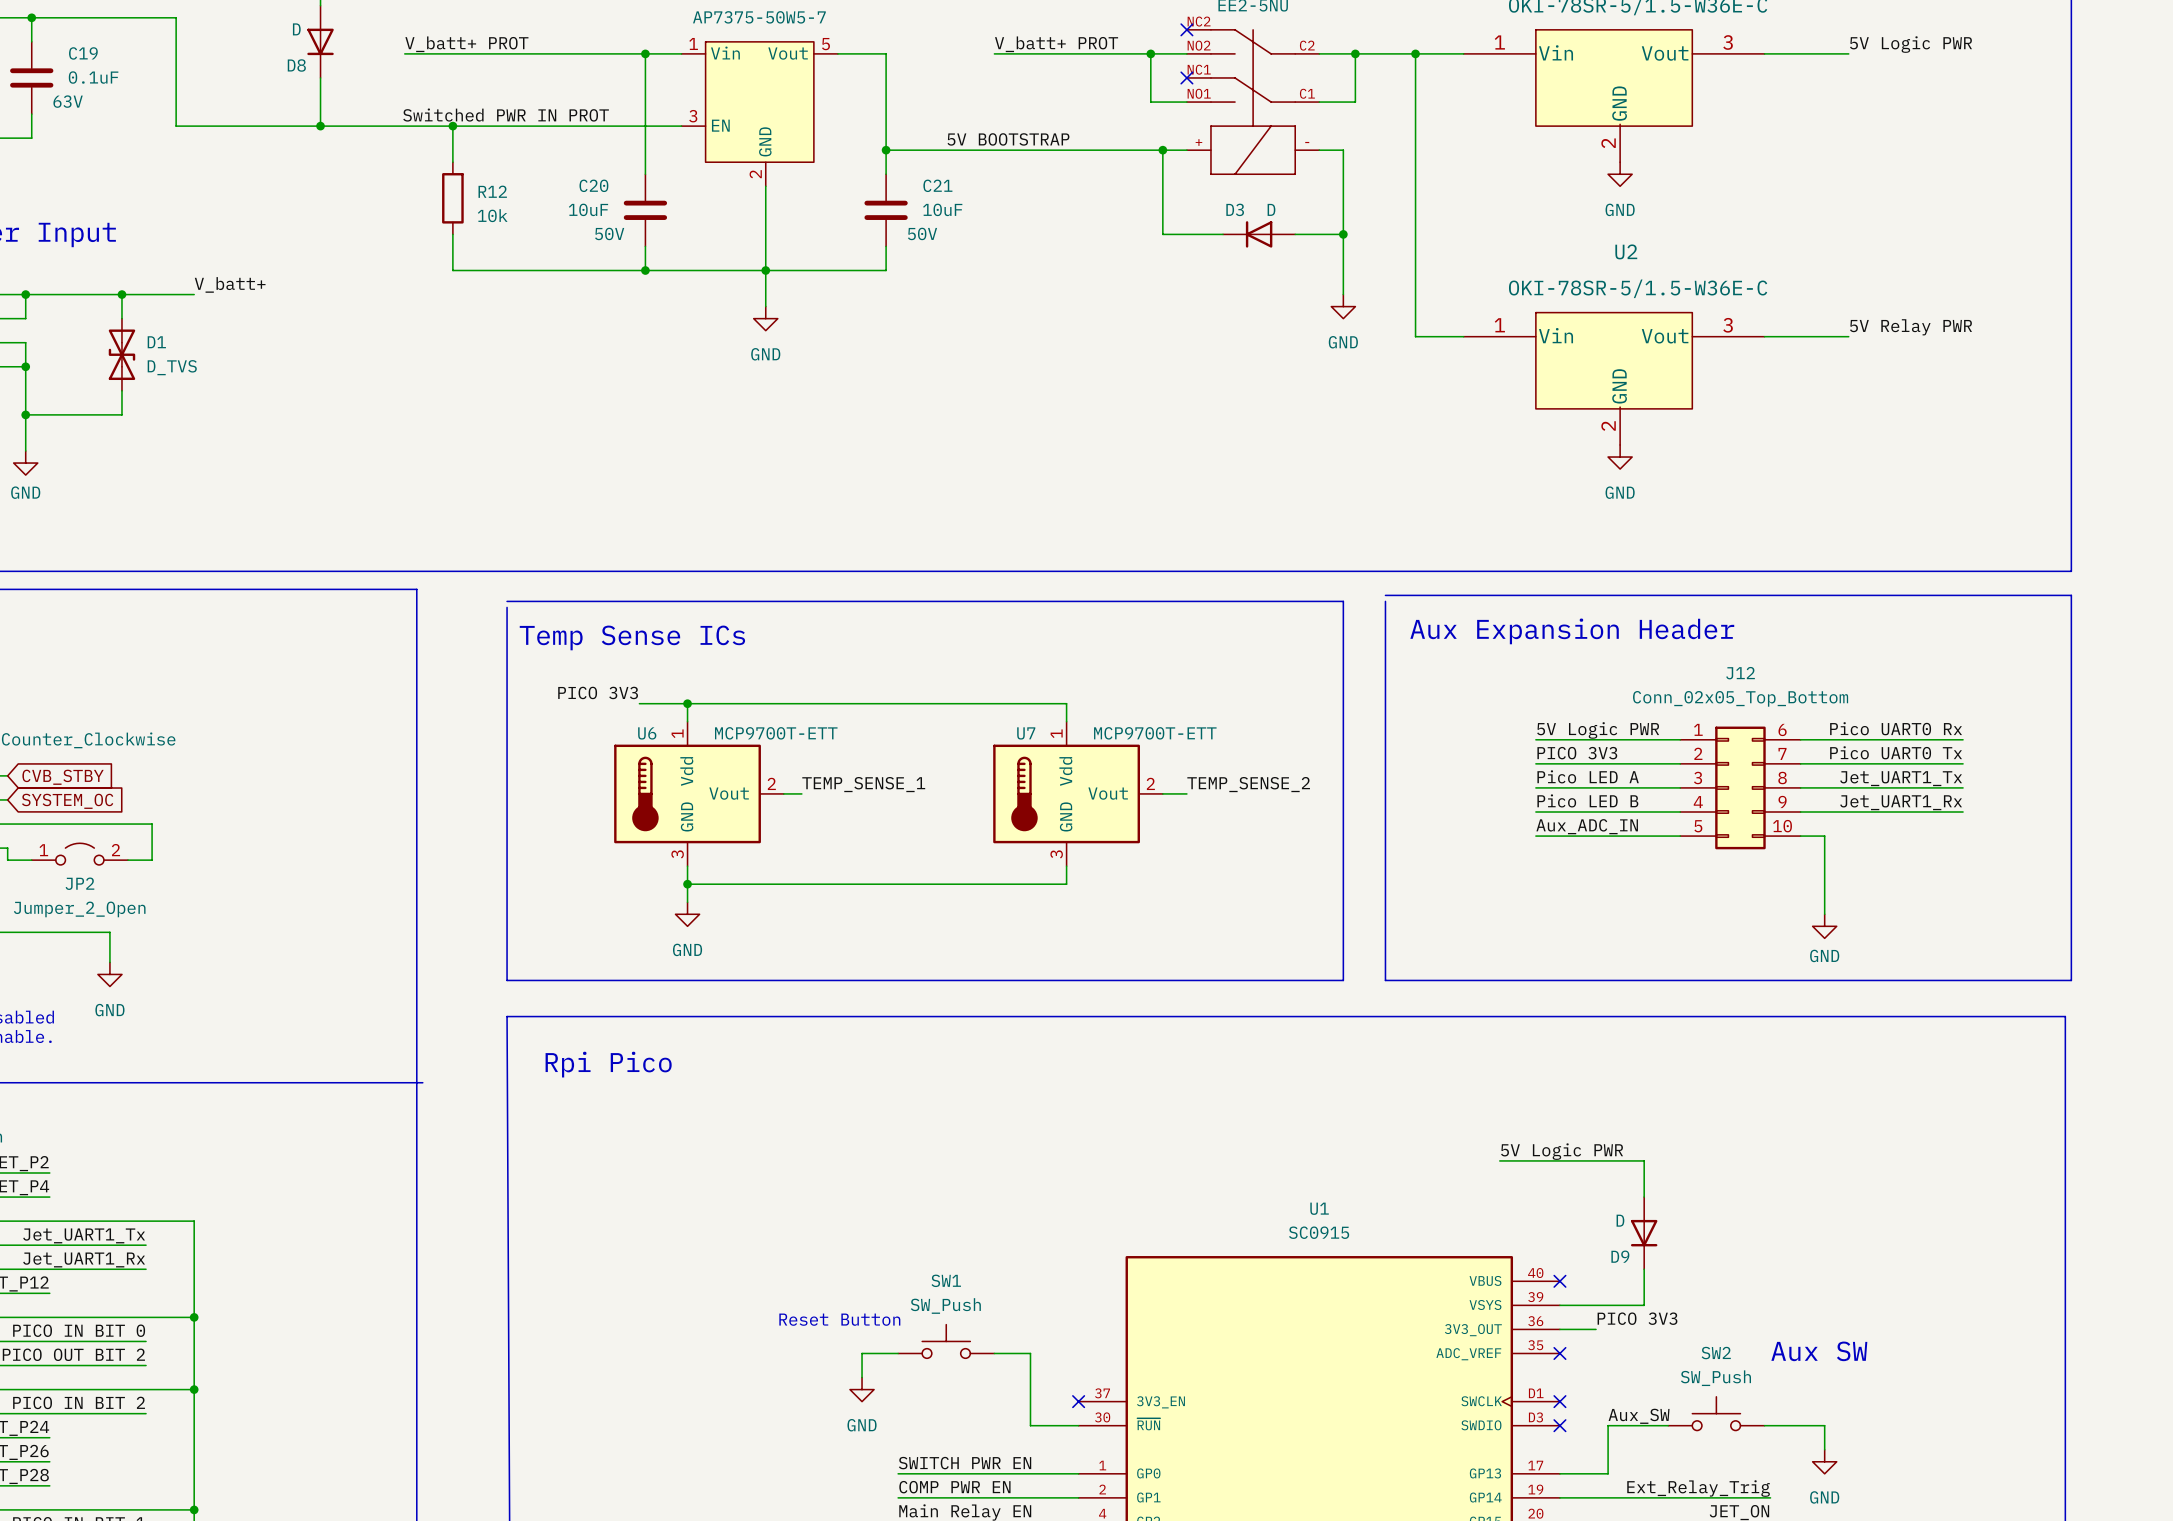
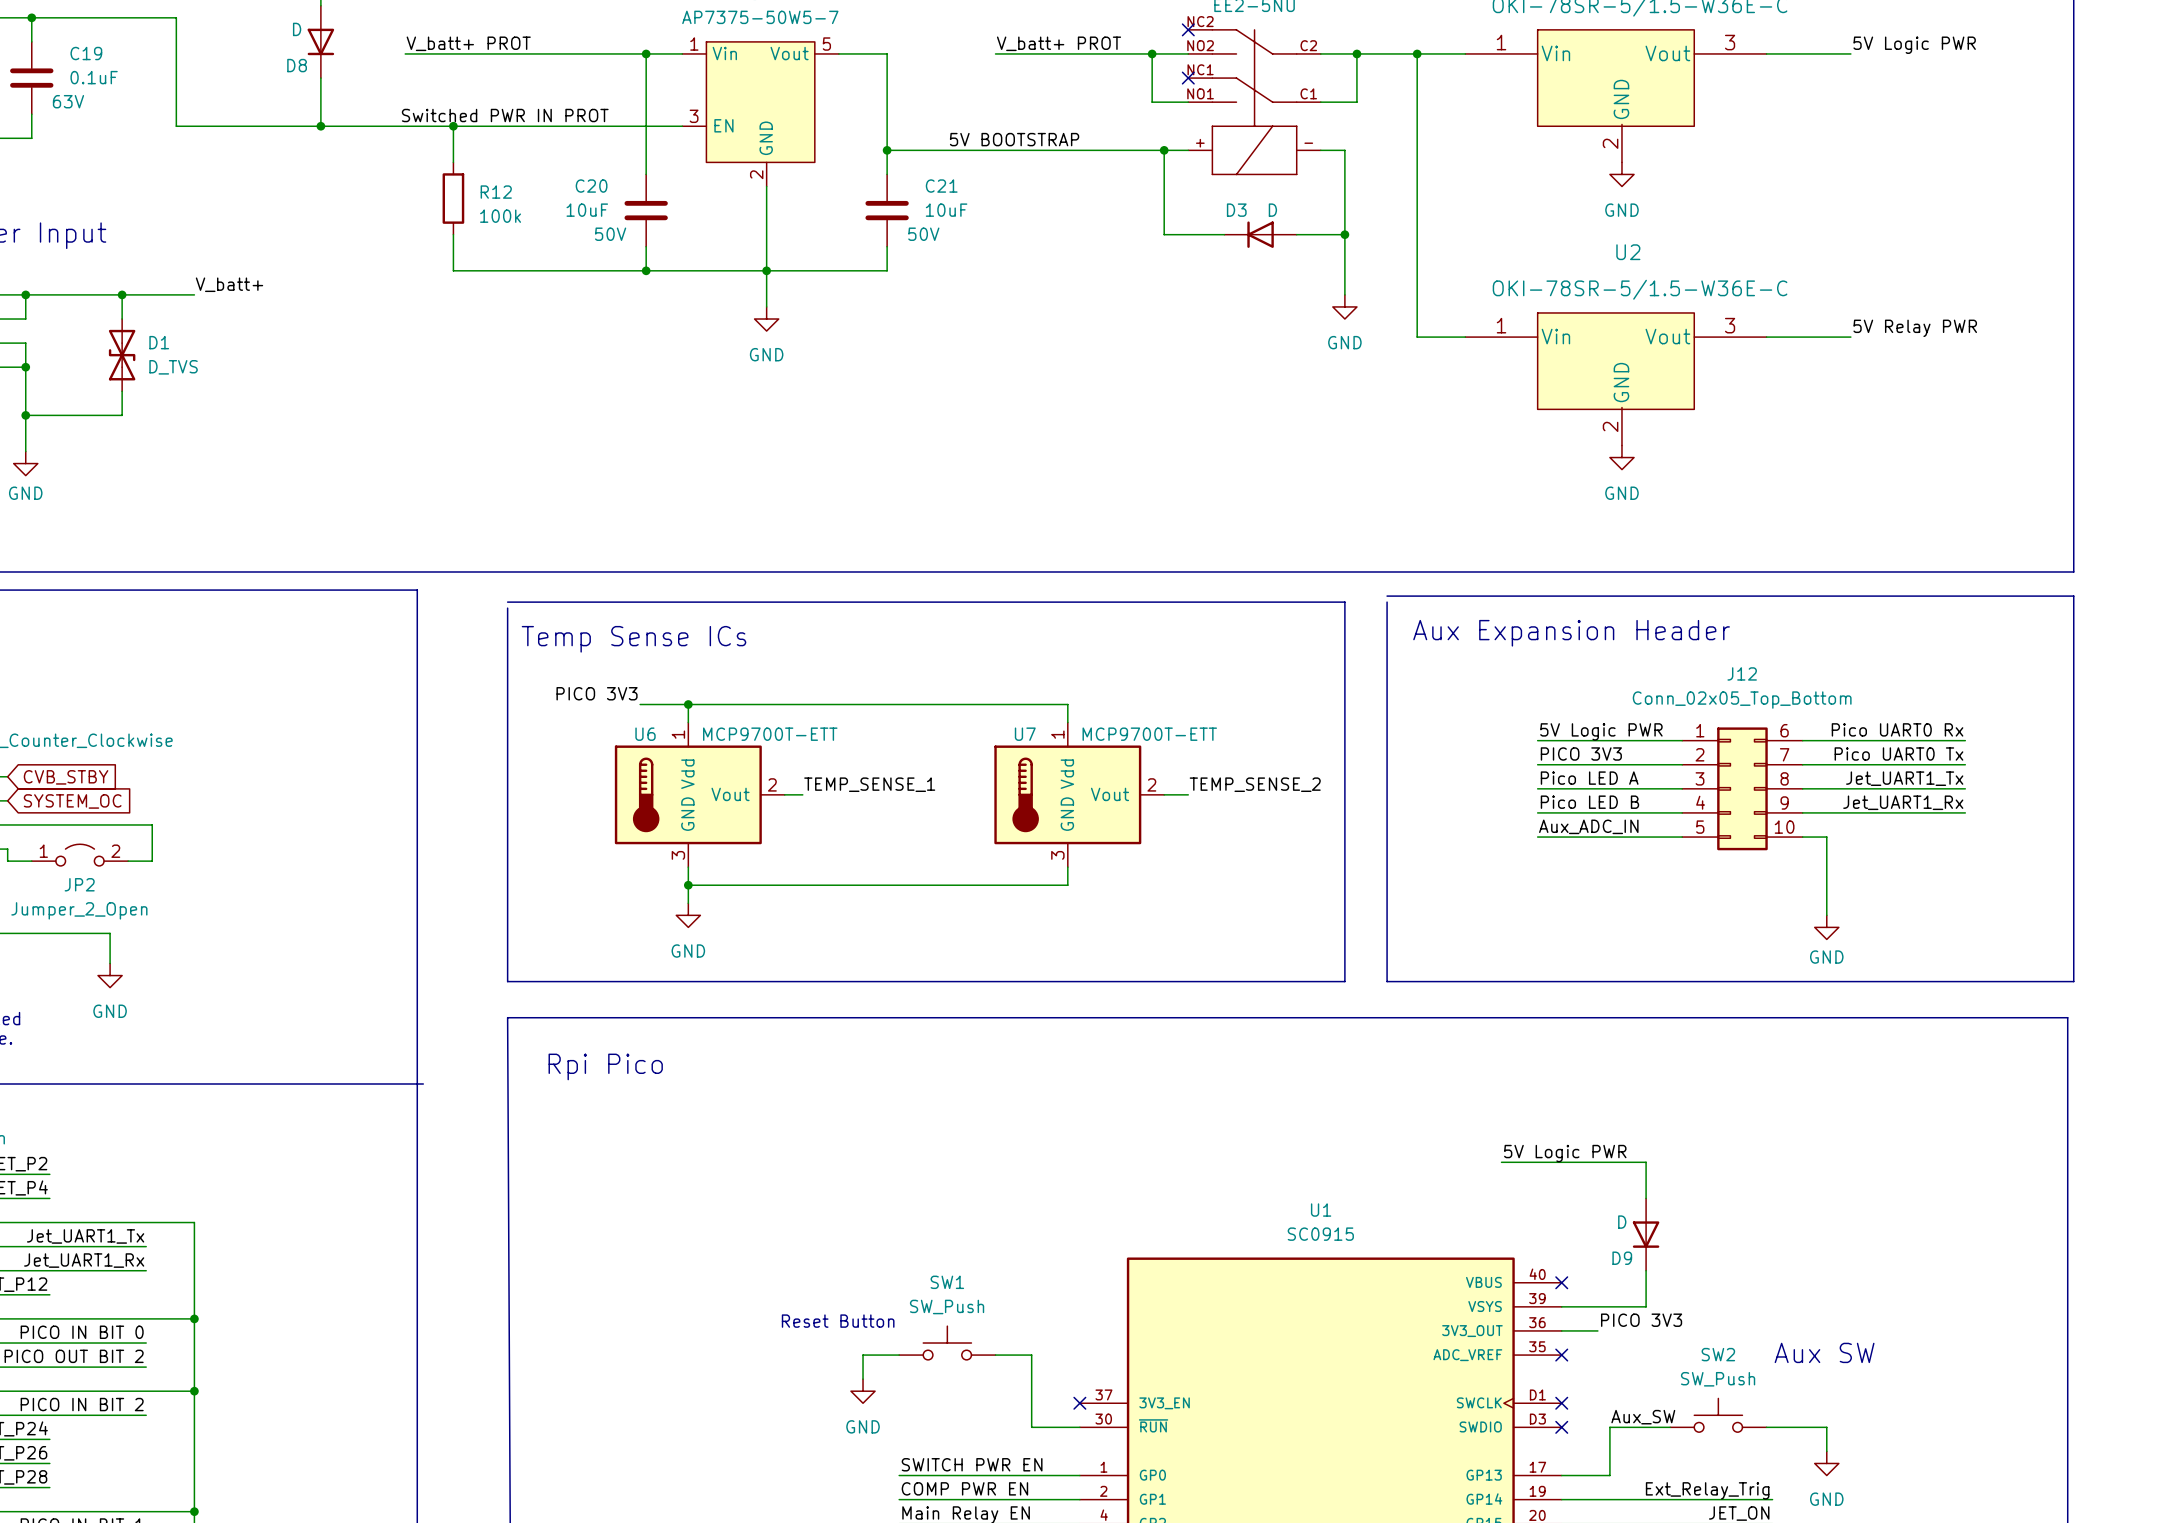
R12 value: 10k (492, 215) -> 100k (500, 216)

